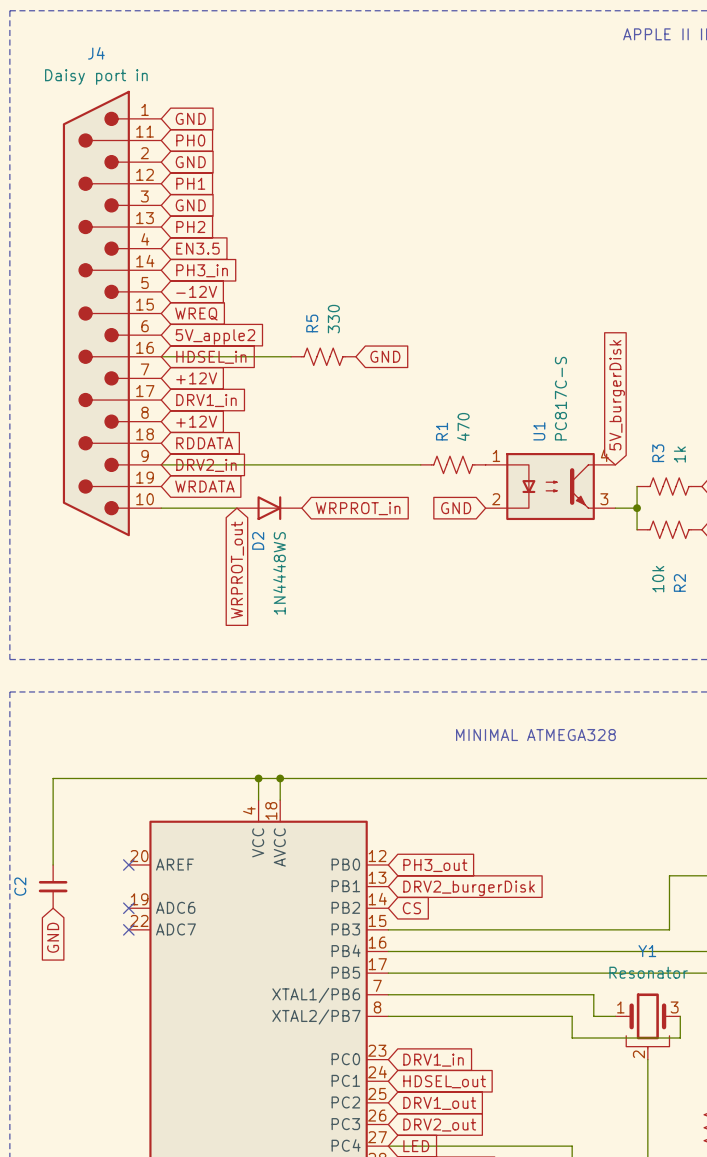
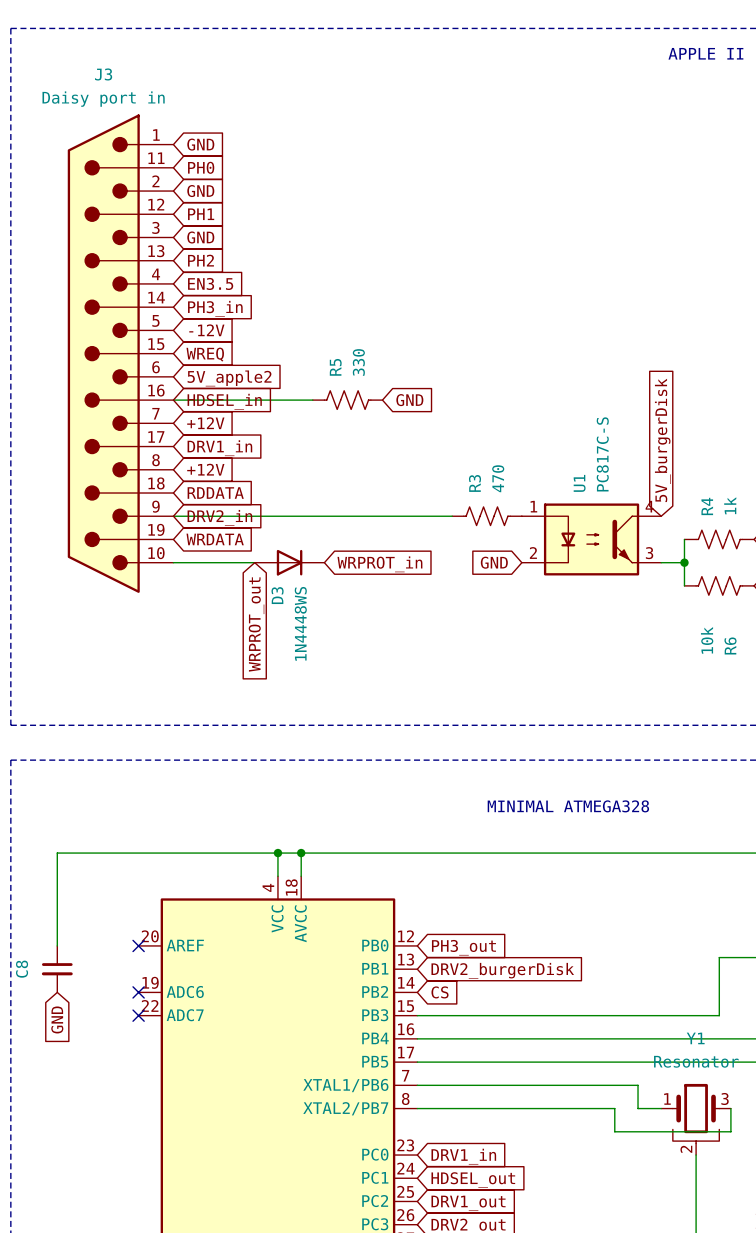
J4 name: J4 (96, 53) -> J3 (103, 74)
R1 name: R1 (442, 431) -> R3 (474, 483)
R3 name: R3 (658, 453) -> R4 (707, 506)
D2 name: D2 (258, 540) -> D3 (277, 595)
R2 name: R2 (679, 582) -> R6 (730, 645)
C2 name: C2 (20, 886) -> C8 (22, 969)

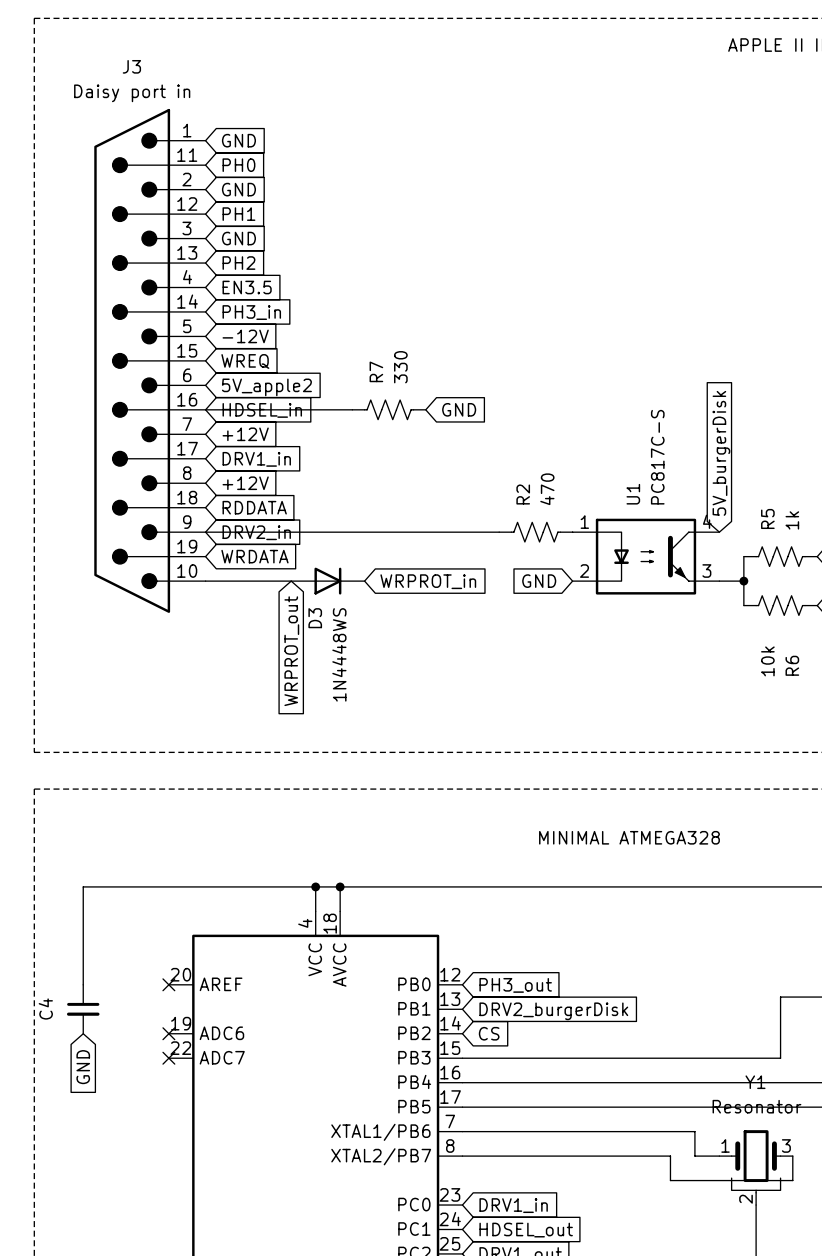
R5 name: R5 (335, 367) -> R7 (376, 371)
R3 name: R3 (474, 483) -> R2 (523, 494)
R4 name: R4 (707, 506) -> R5 (767, 518)
C8 name: C8 (22, 969) -> C4 (45, 1008)

